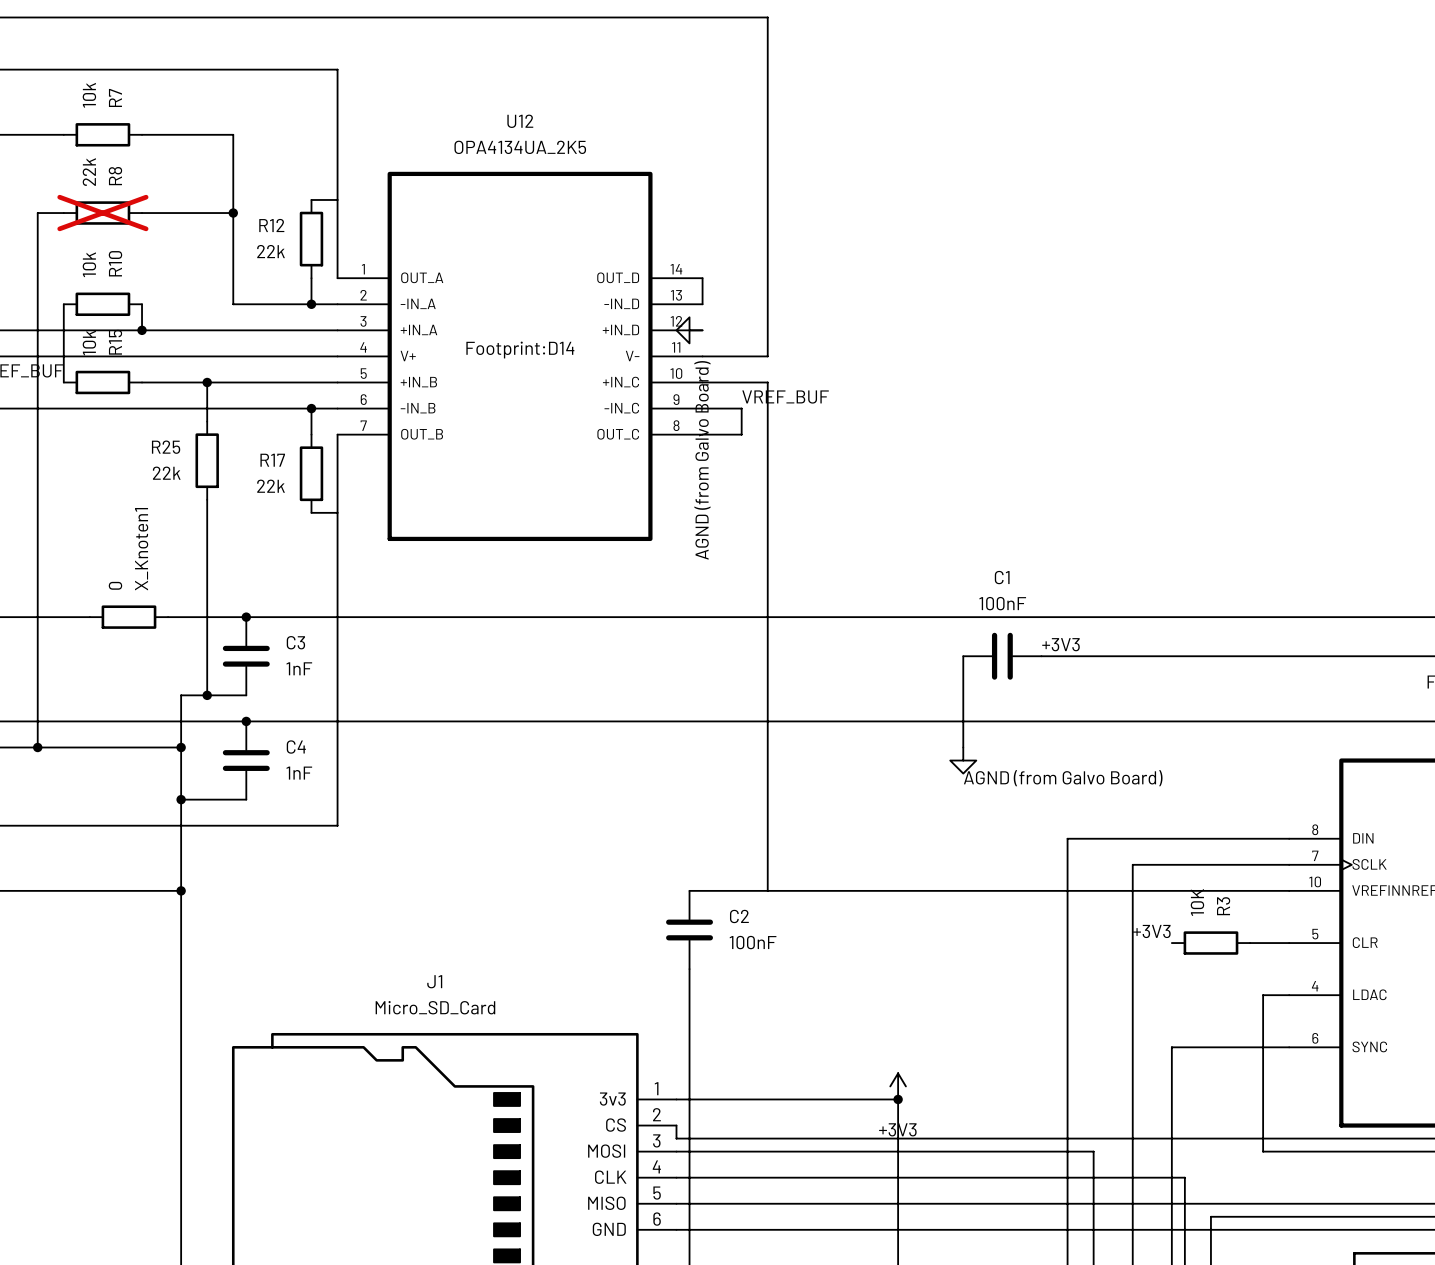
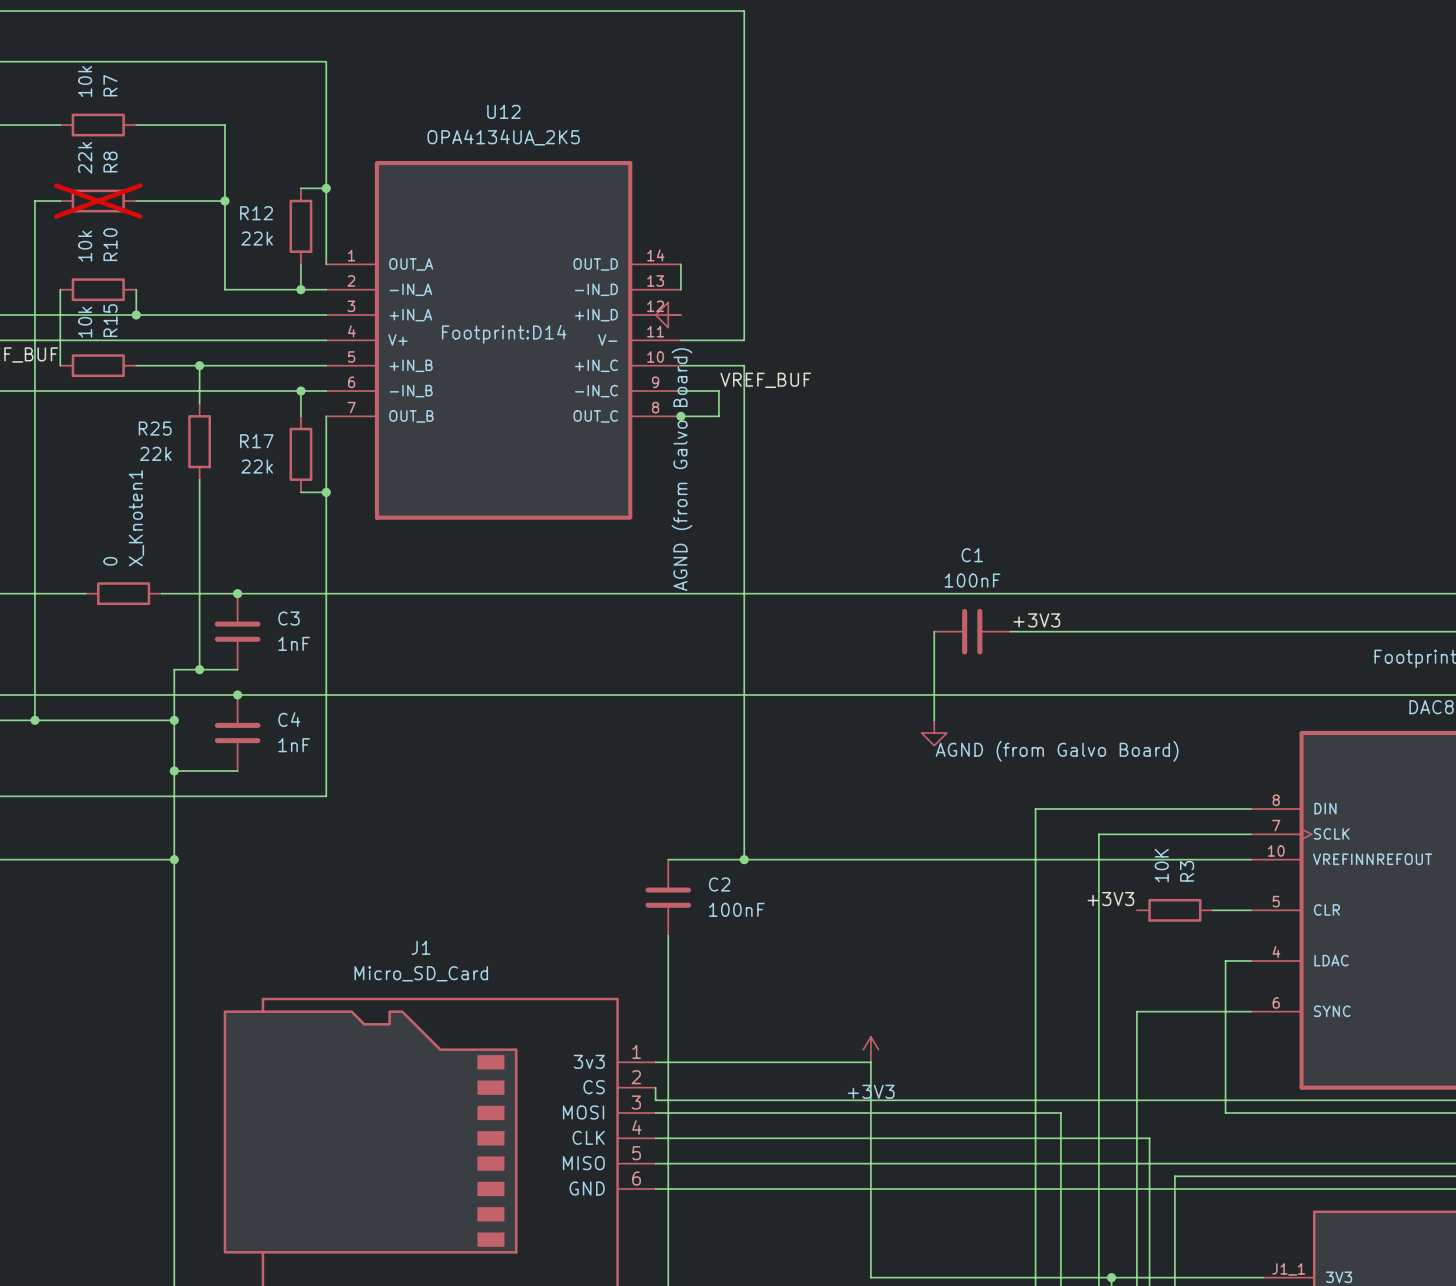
junction: none -> (326, 188)
junction: none -> (680, 416)
junction: none -> (326, 492)
junction: none -> (744, 859)
junction: (898, 1099) -> none

